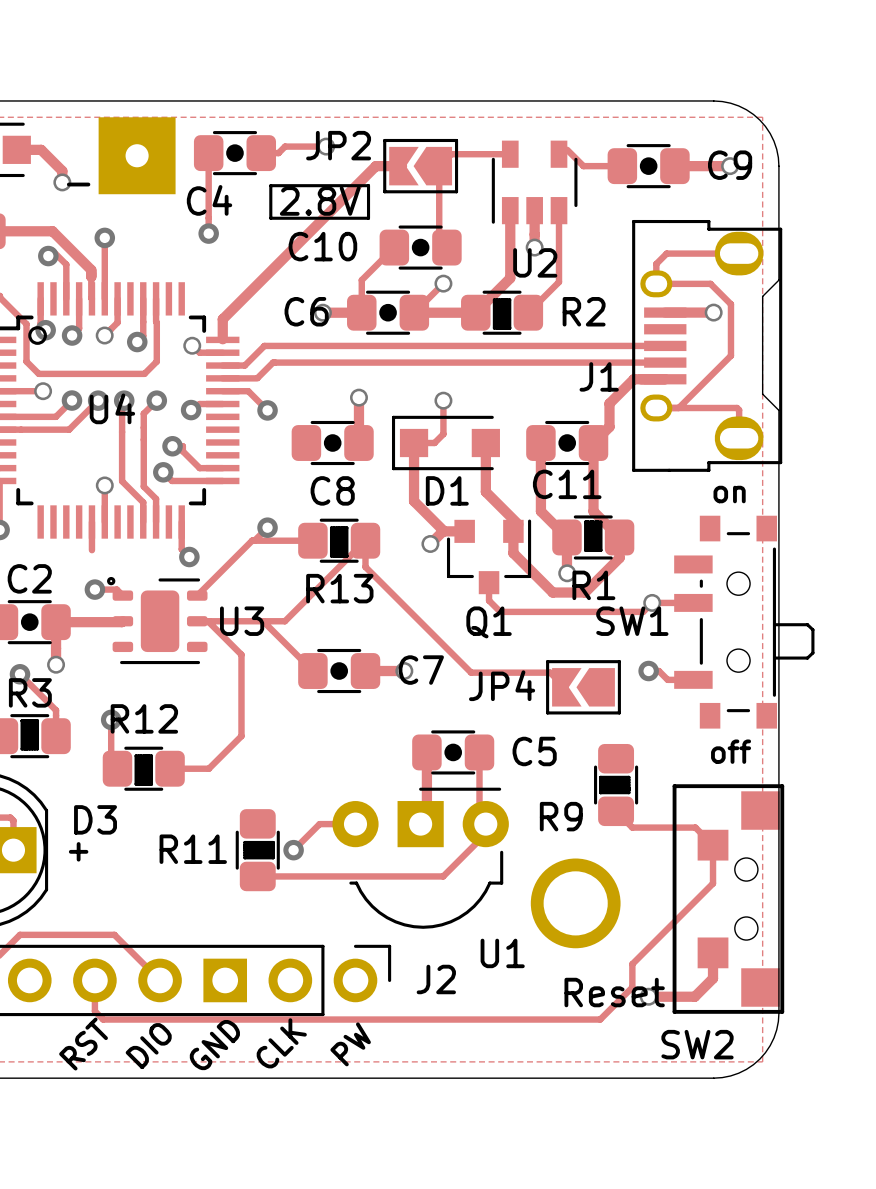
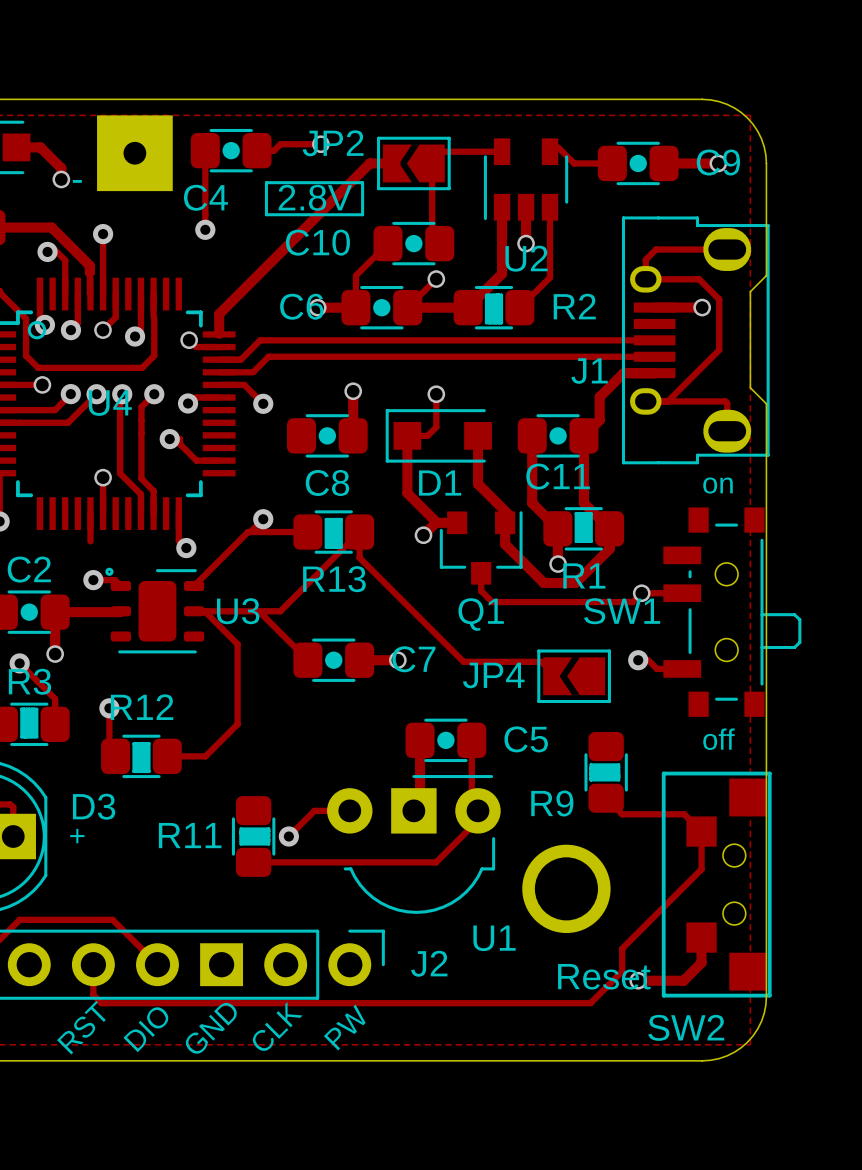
track: (163, 472) (171, 480) (222, 480) -> none
via: (163, 472) -> none

